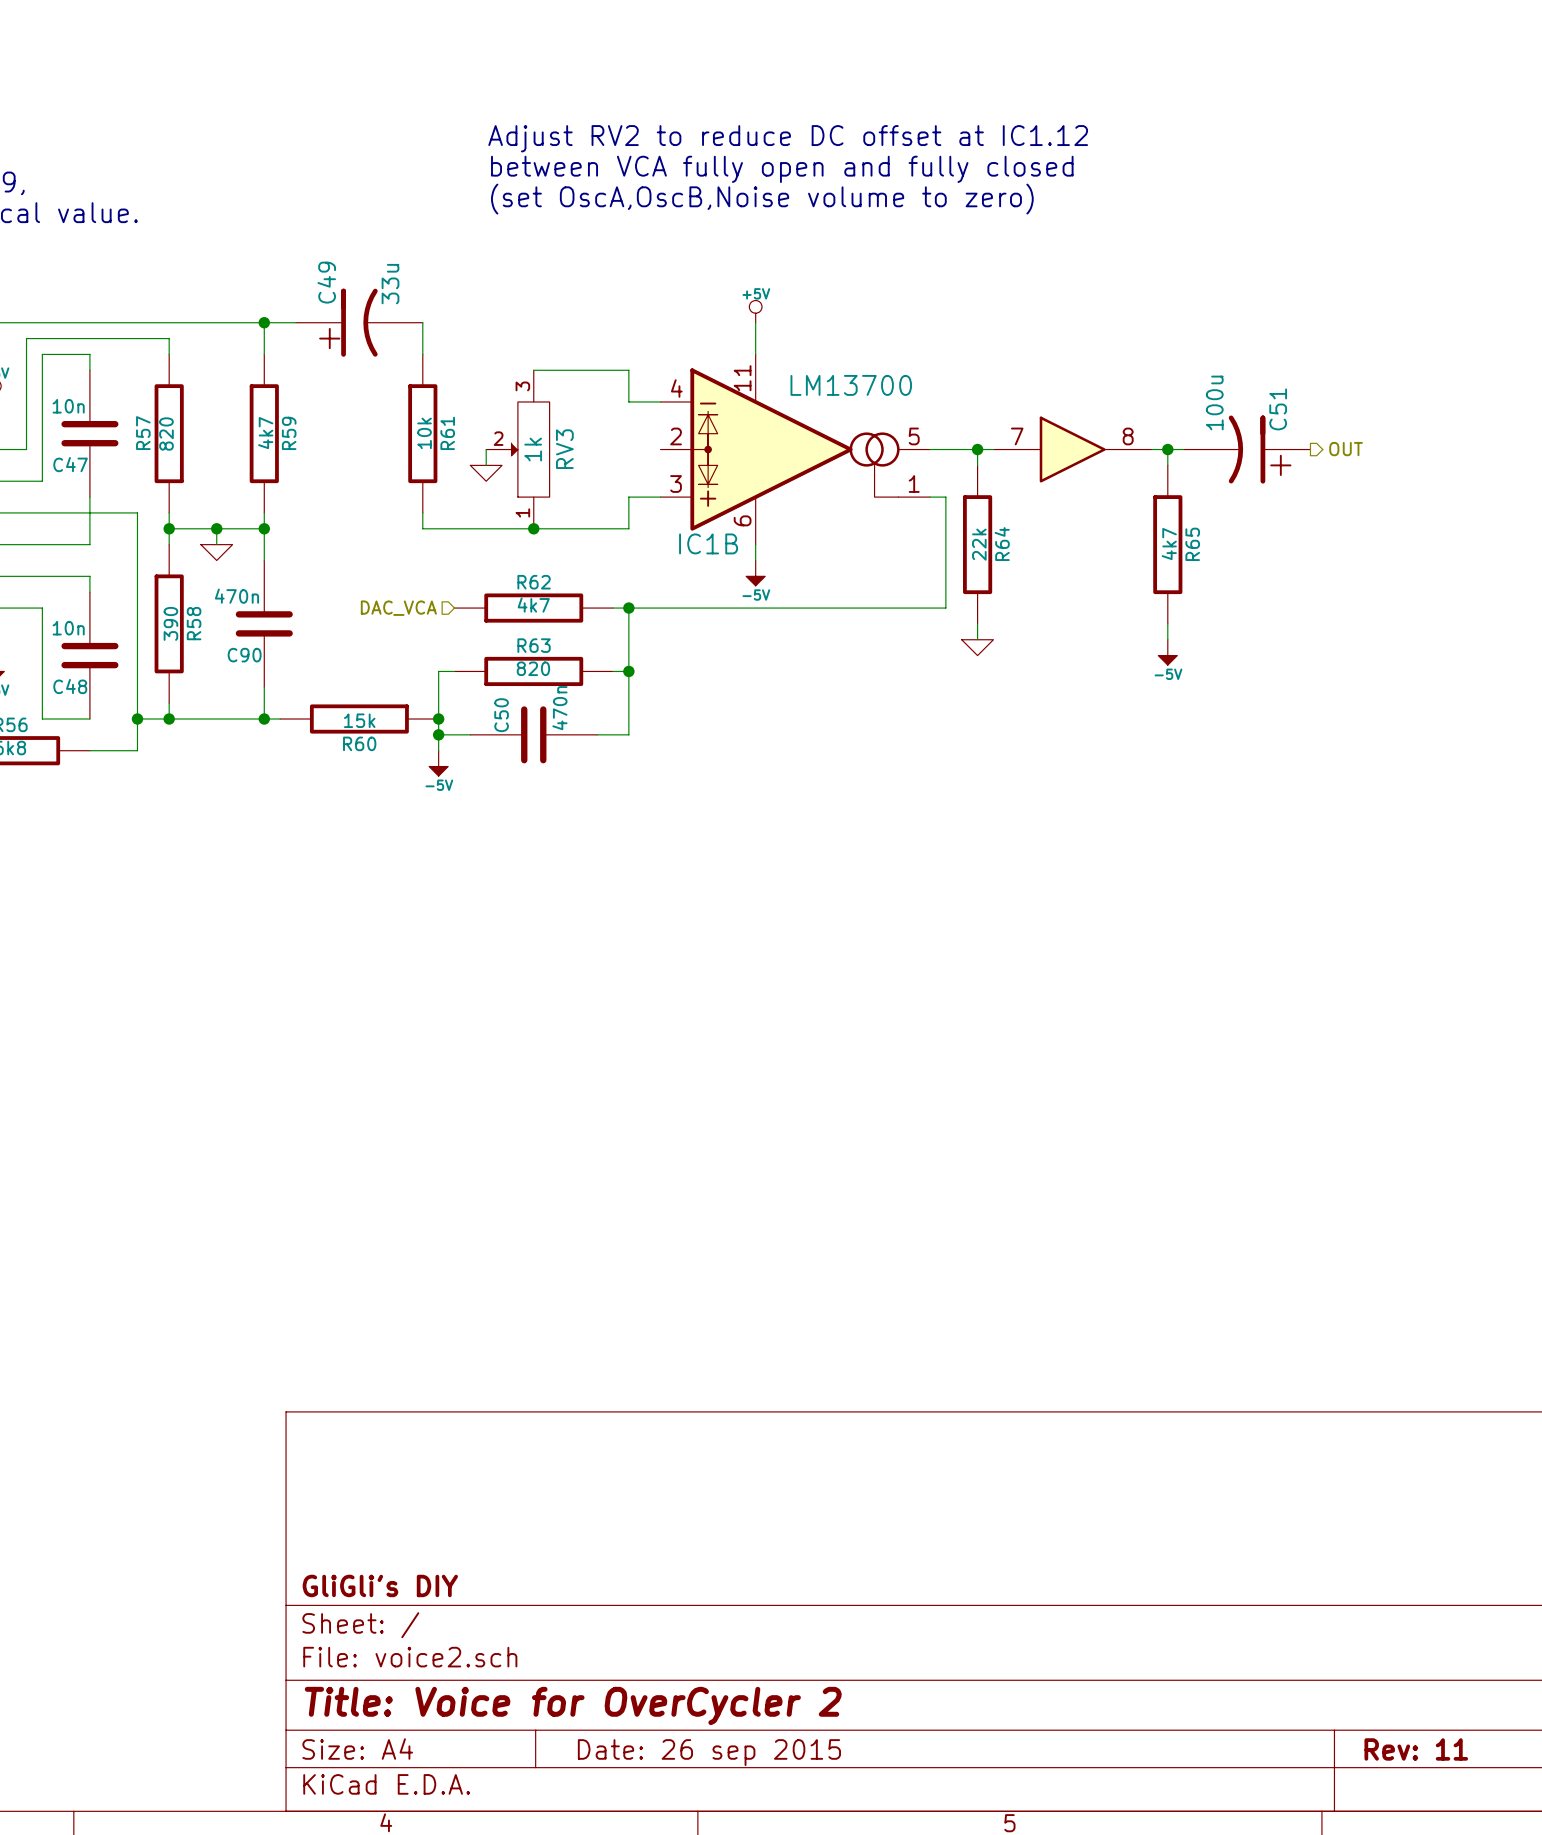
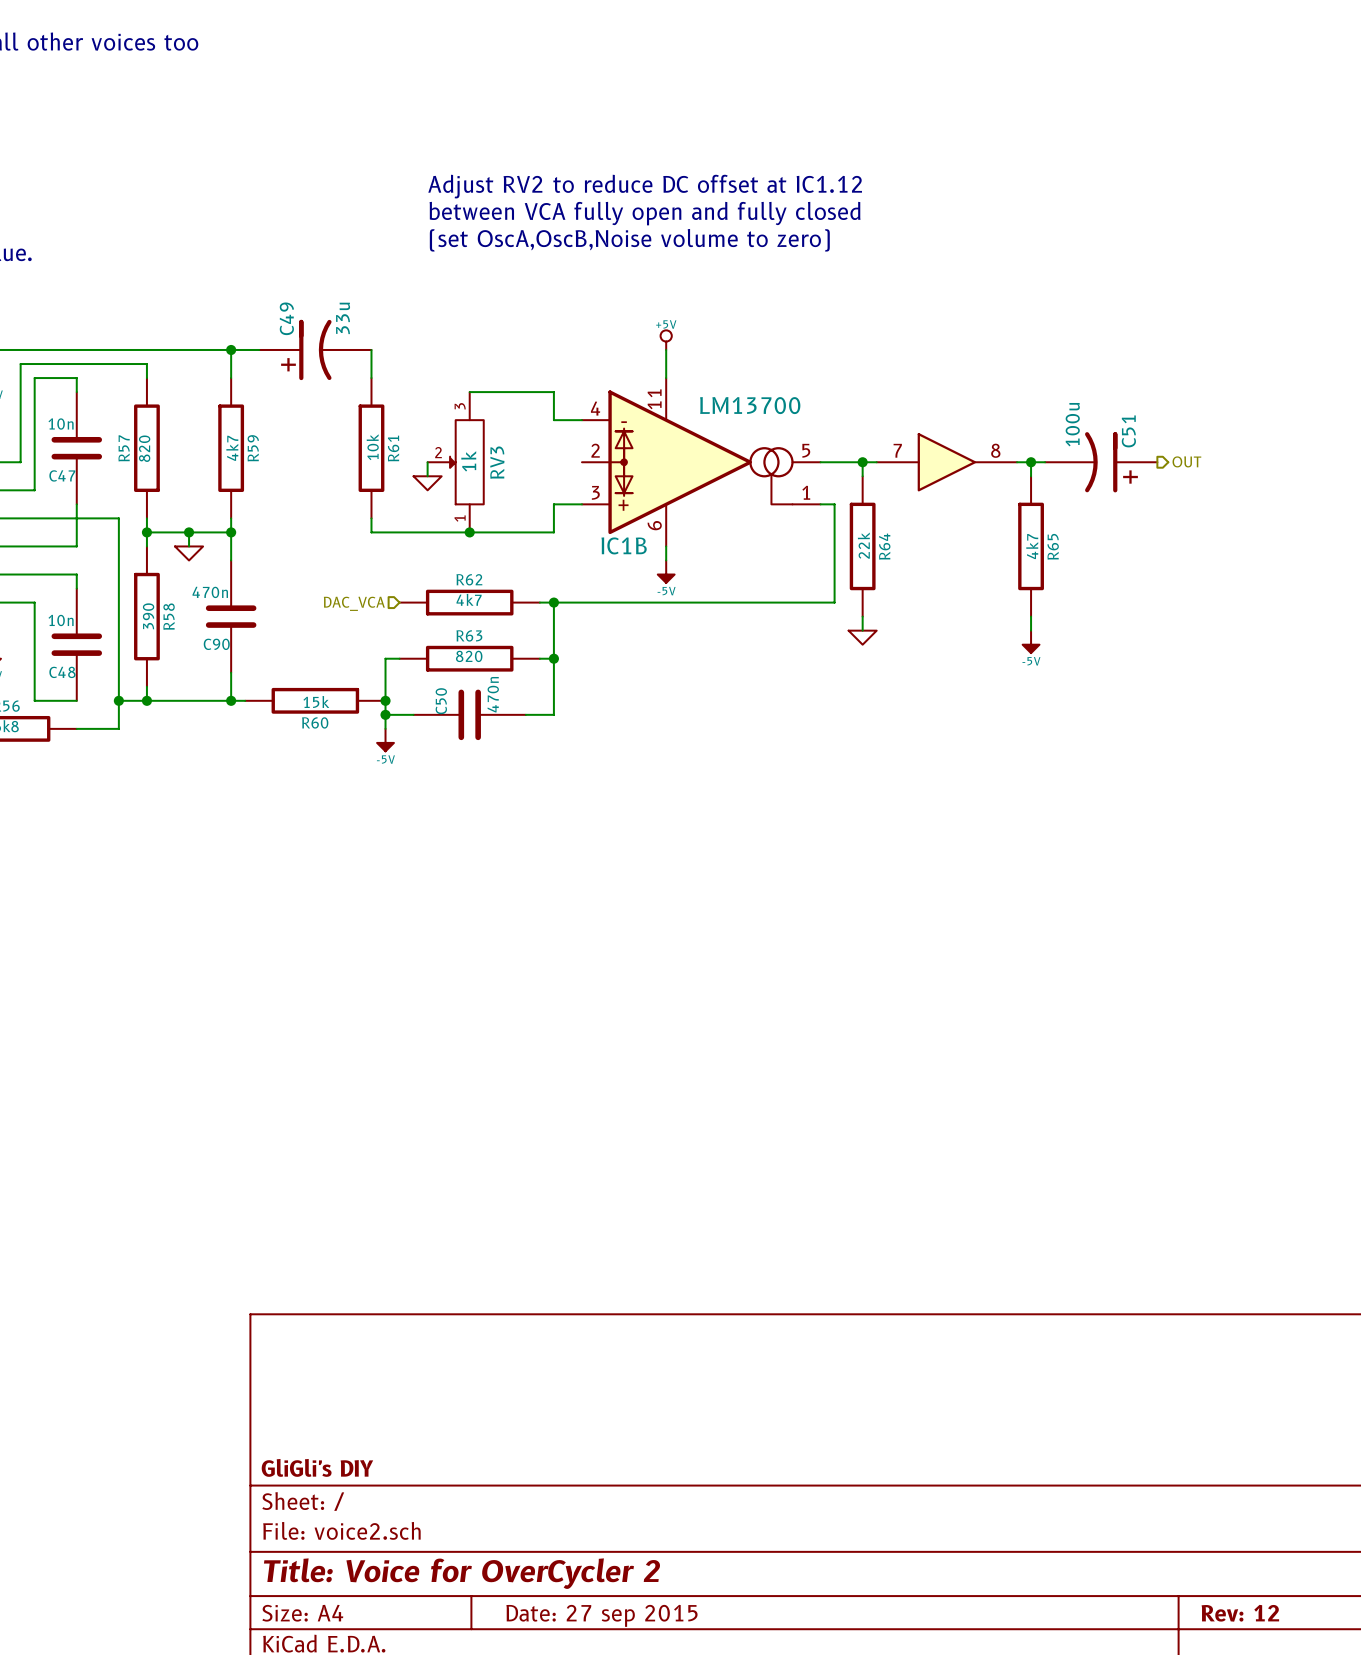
title block: Rev: 11 (1416, 1749) -> Rev: 12 (1240, 1613)
title block: Date: 26 sep 2015 (709, 1752) -> Date: 27 sep 2015 (601, 1615)

